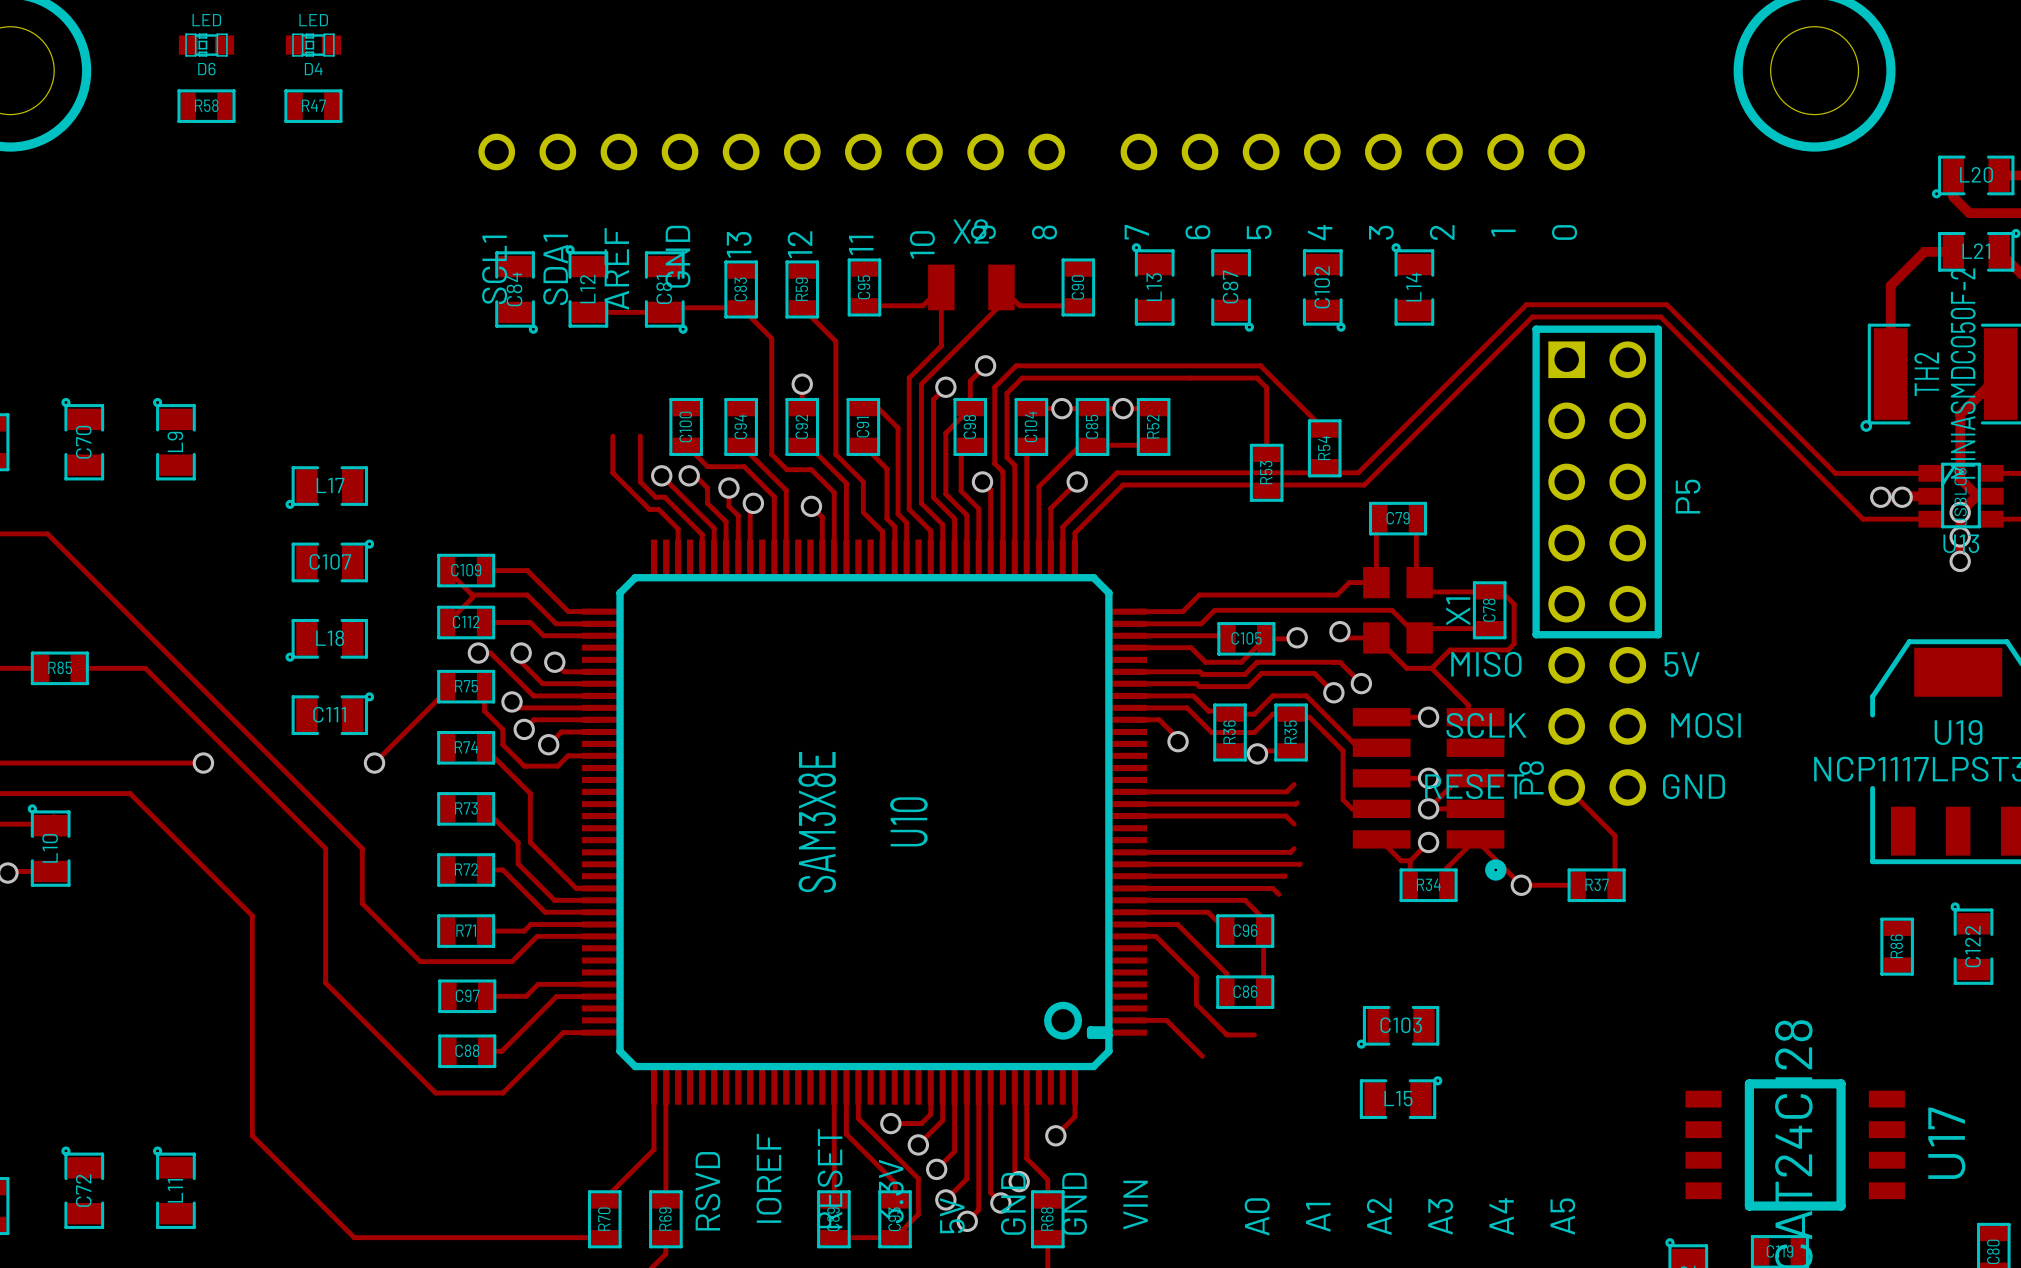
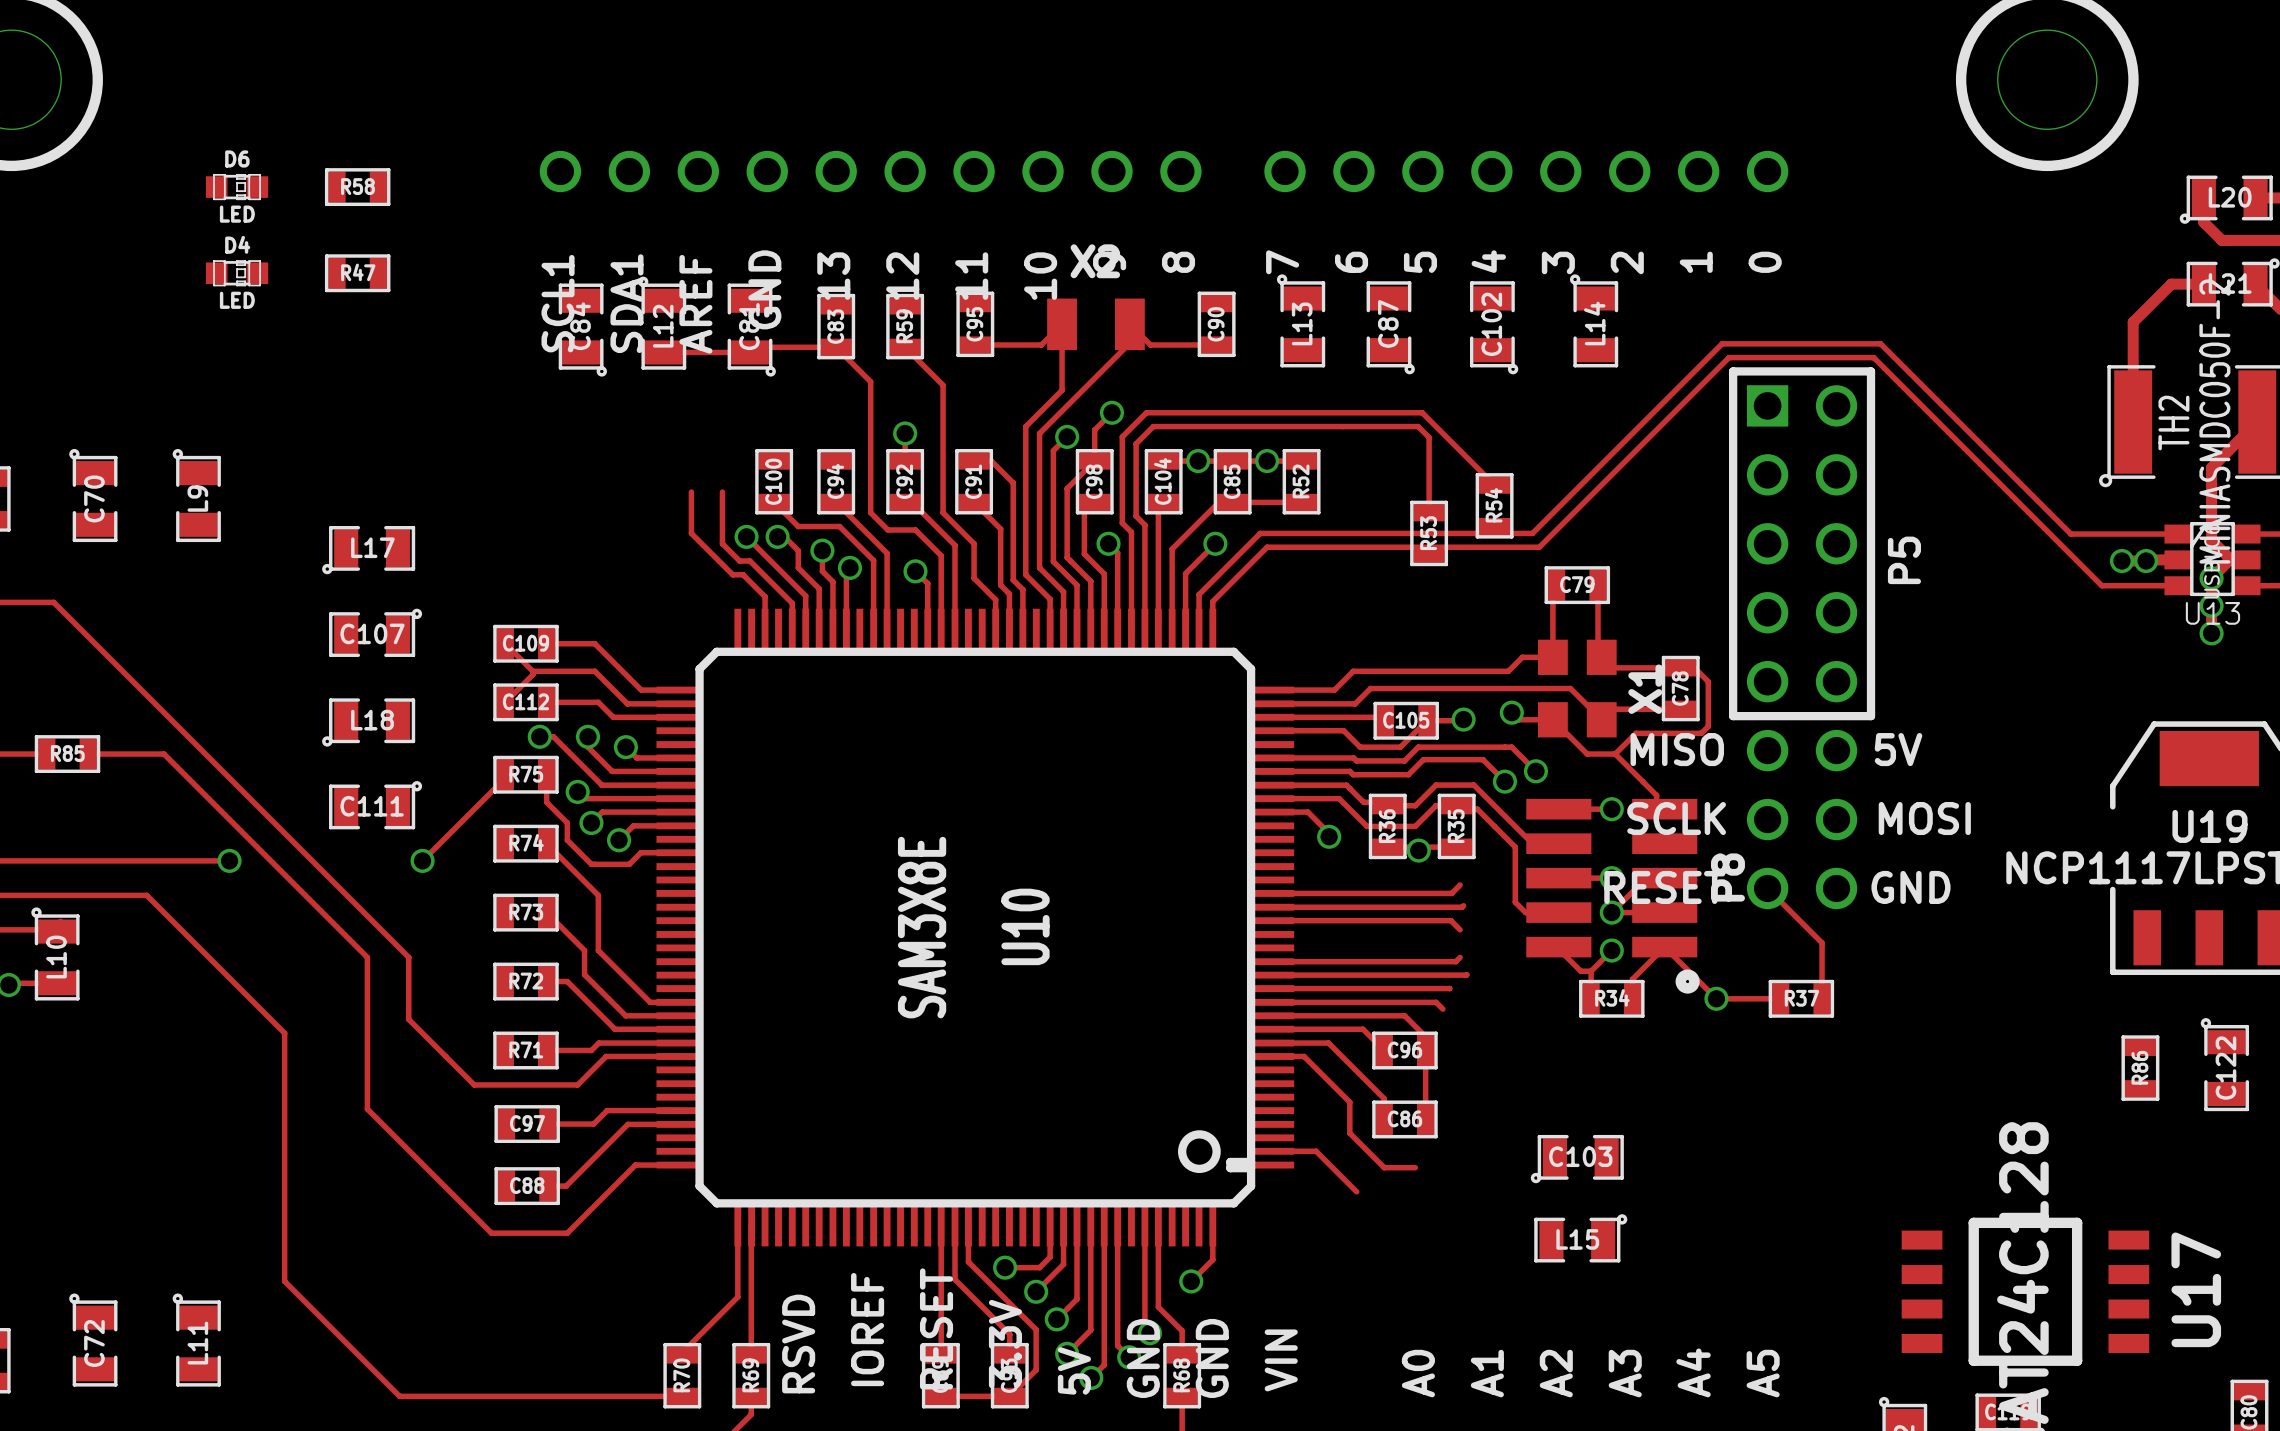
D6 rotation: 0° (206, 45) -> 180° (237, 187)
D6 position: (206, 45) -> (237, 187)
D4 rotation: 0° (313, 45) -> 180° (237, 273)
D4 position: (313, 45) -> (237, 273)
R58 position: (206, 106) -> (357, 187)
R47 position: (313, 106) -> (357, 273)

